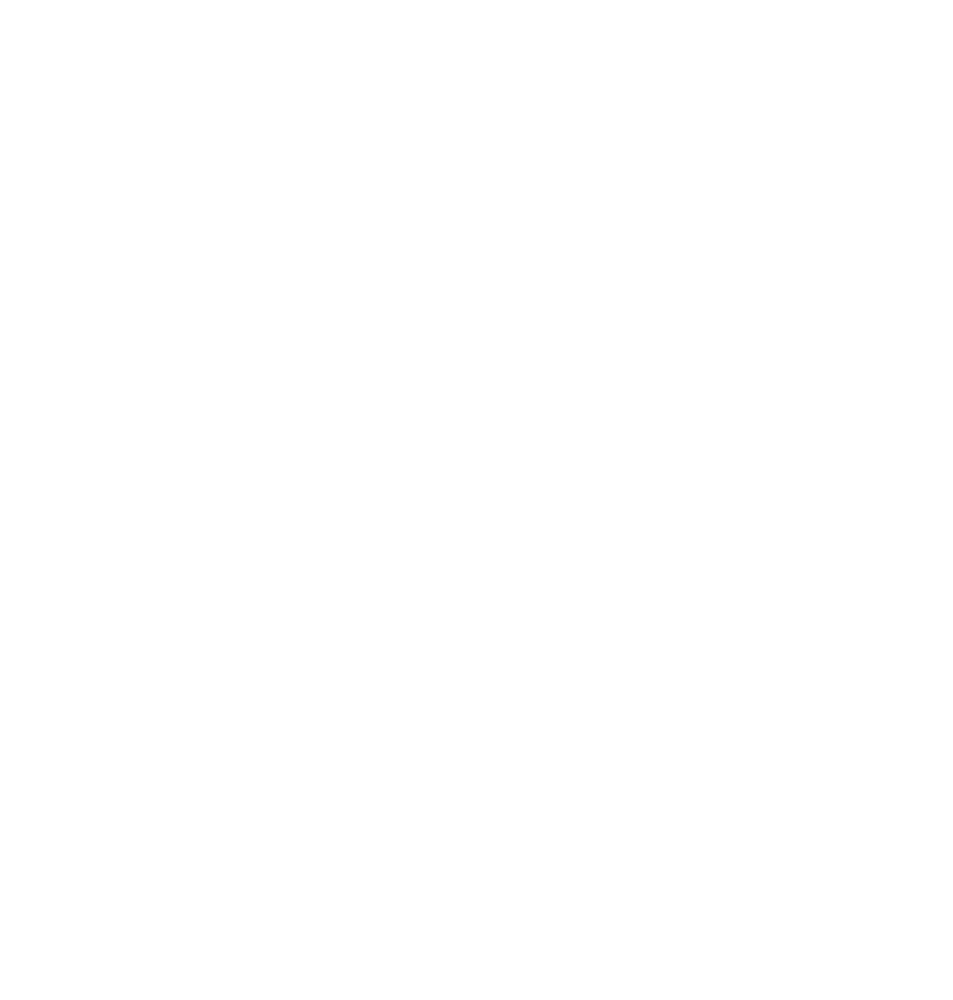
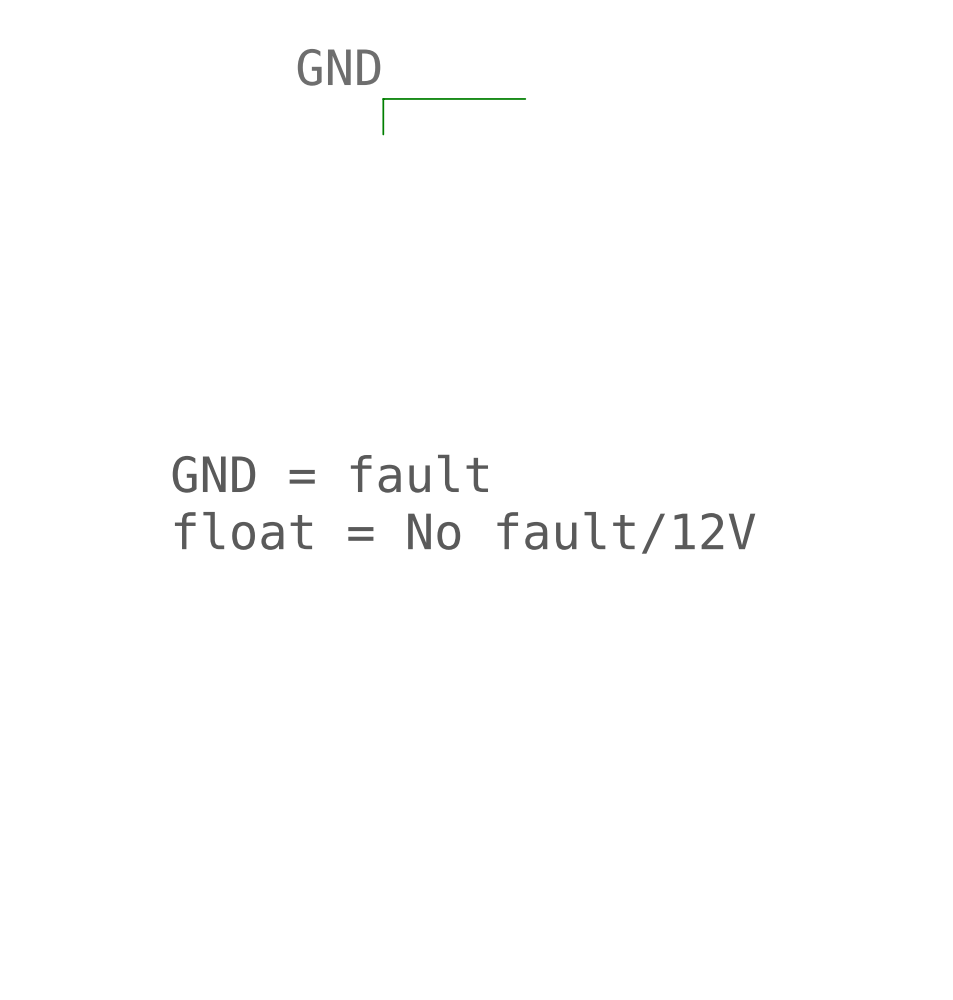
label: none -> GND (339, 67)
wire: none -> (525, 98) (383, 98) (383, 134)
text: none -> GND = fault (330, 473)
text: none -> float = No fault/12V (465, 532)

